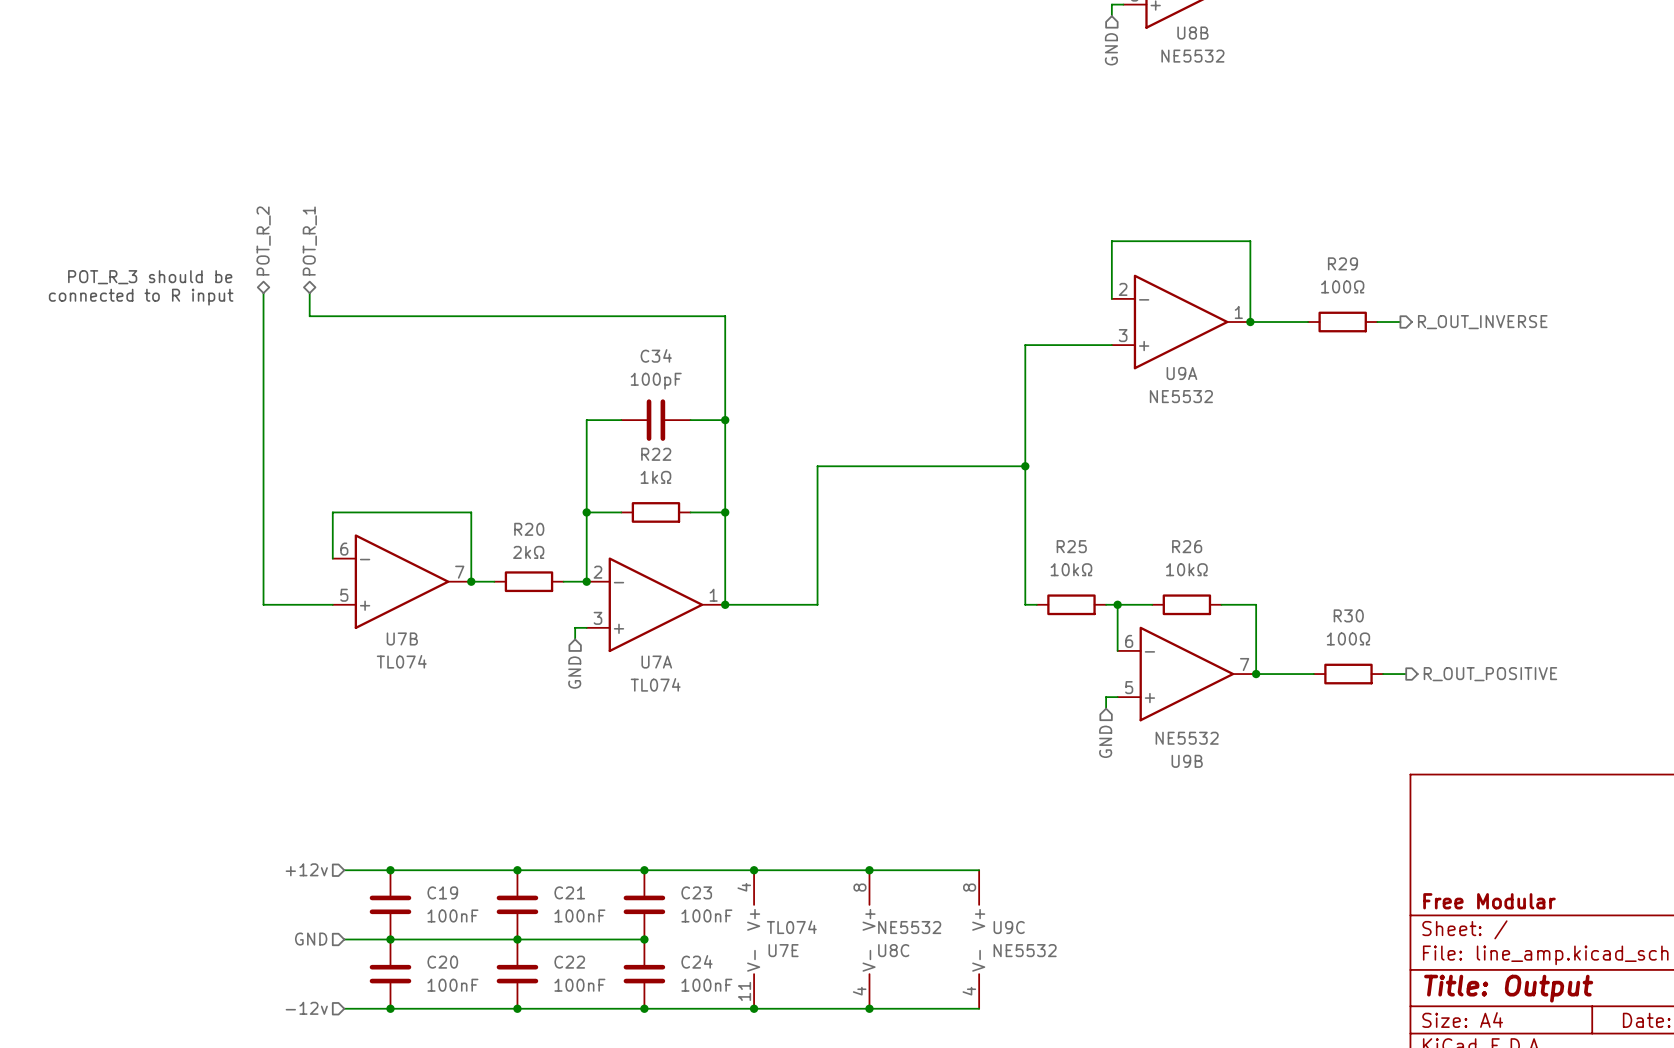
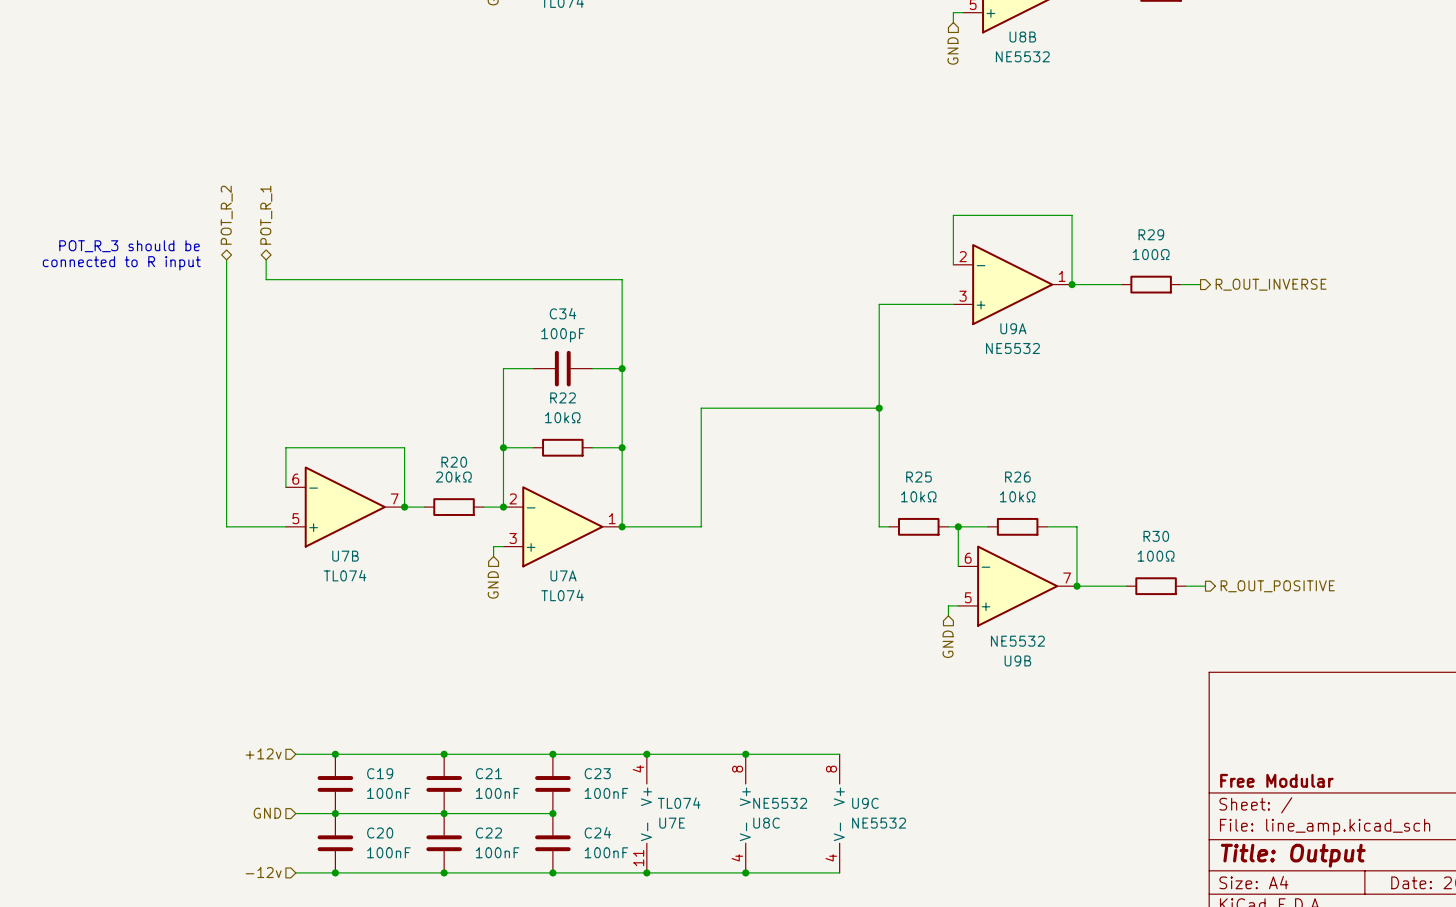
R22 value: 1kΩ (655, 477) -> 10kΩ (562, 417)
R20 value: 2kΩ (528, 552) -> 20kΩ (453, 477)

